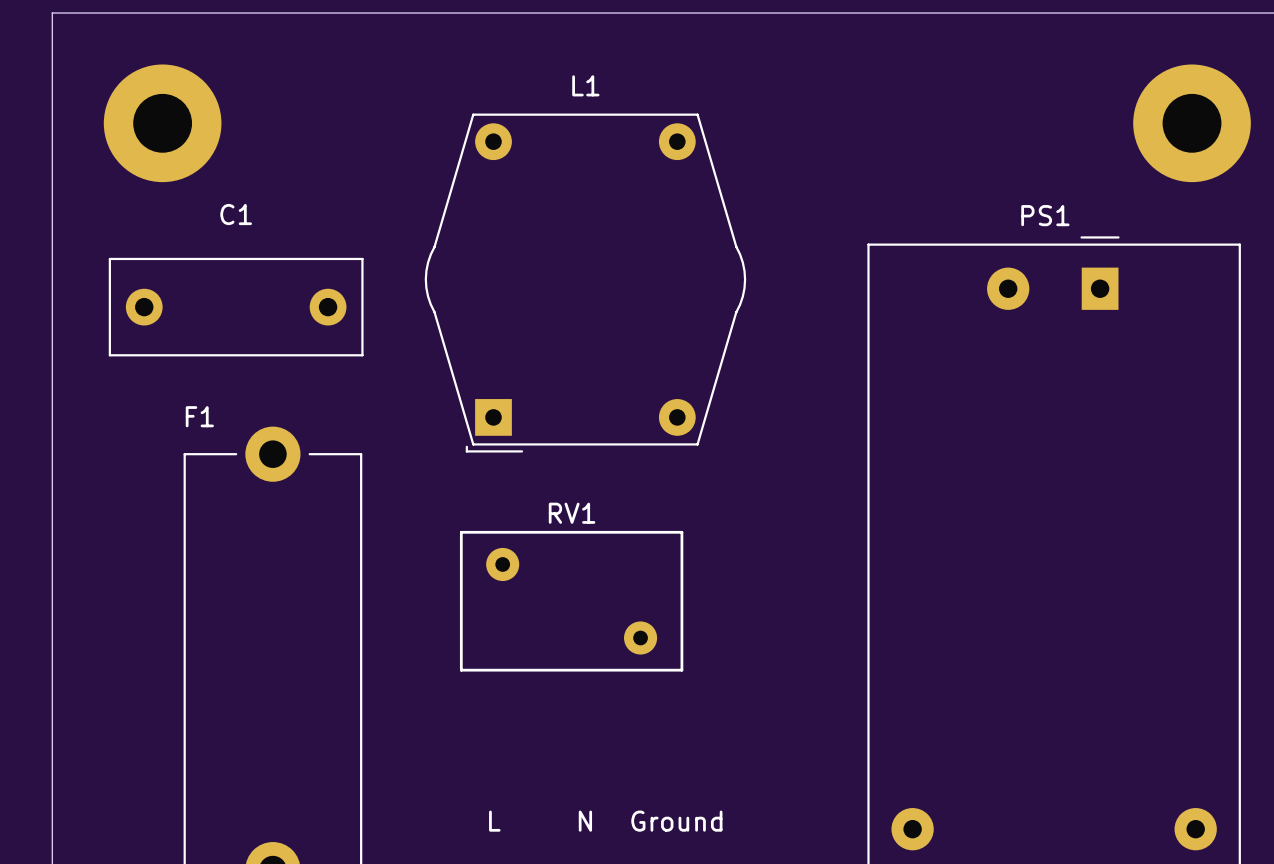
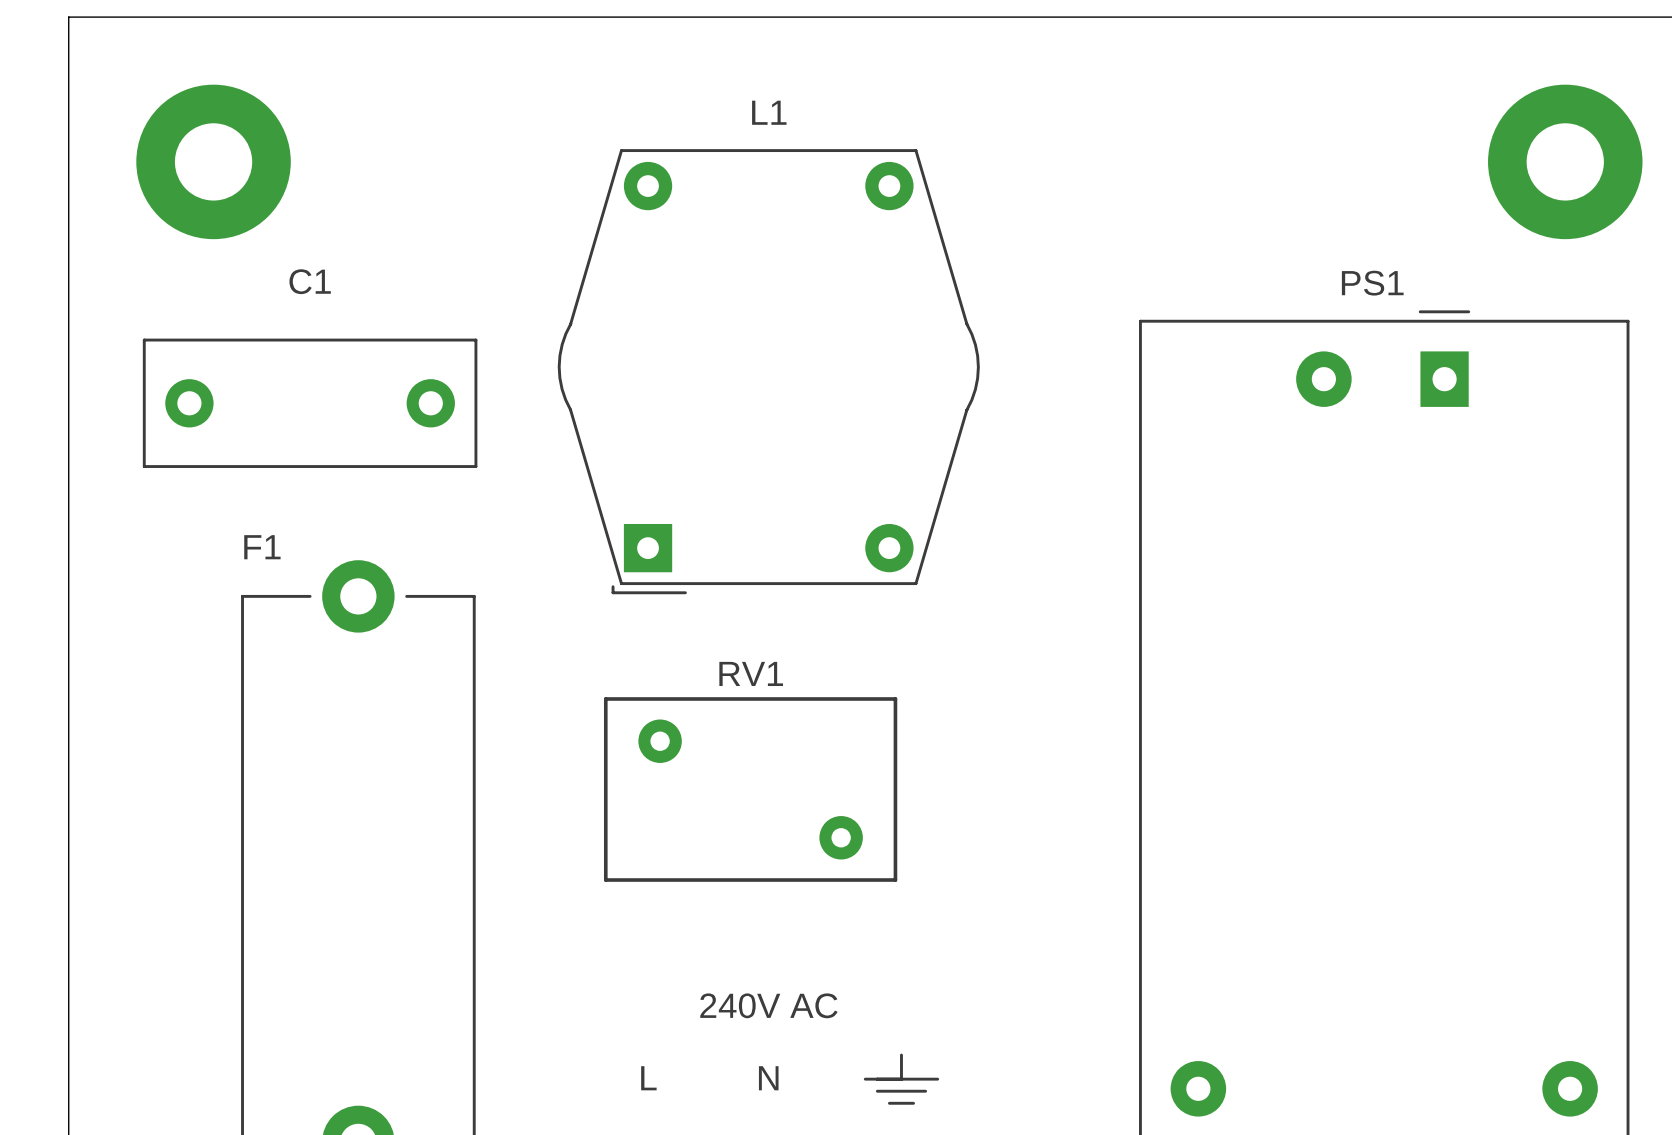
text: none -> 240V AC (768, 1005)
line: none -> (901, 1055) (901, 1079)
line: none -> (865, 1079) (937, 1079)
text: Ground (676, 821) -> none
line: none -> (877, 1091) (925, 1091)
line: none -> (889, 1103) (913, 1103)

